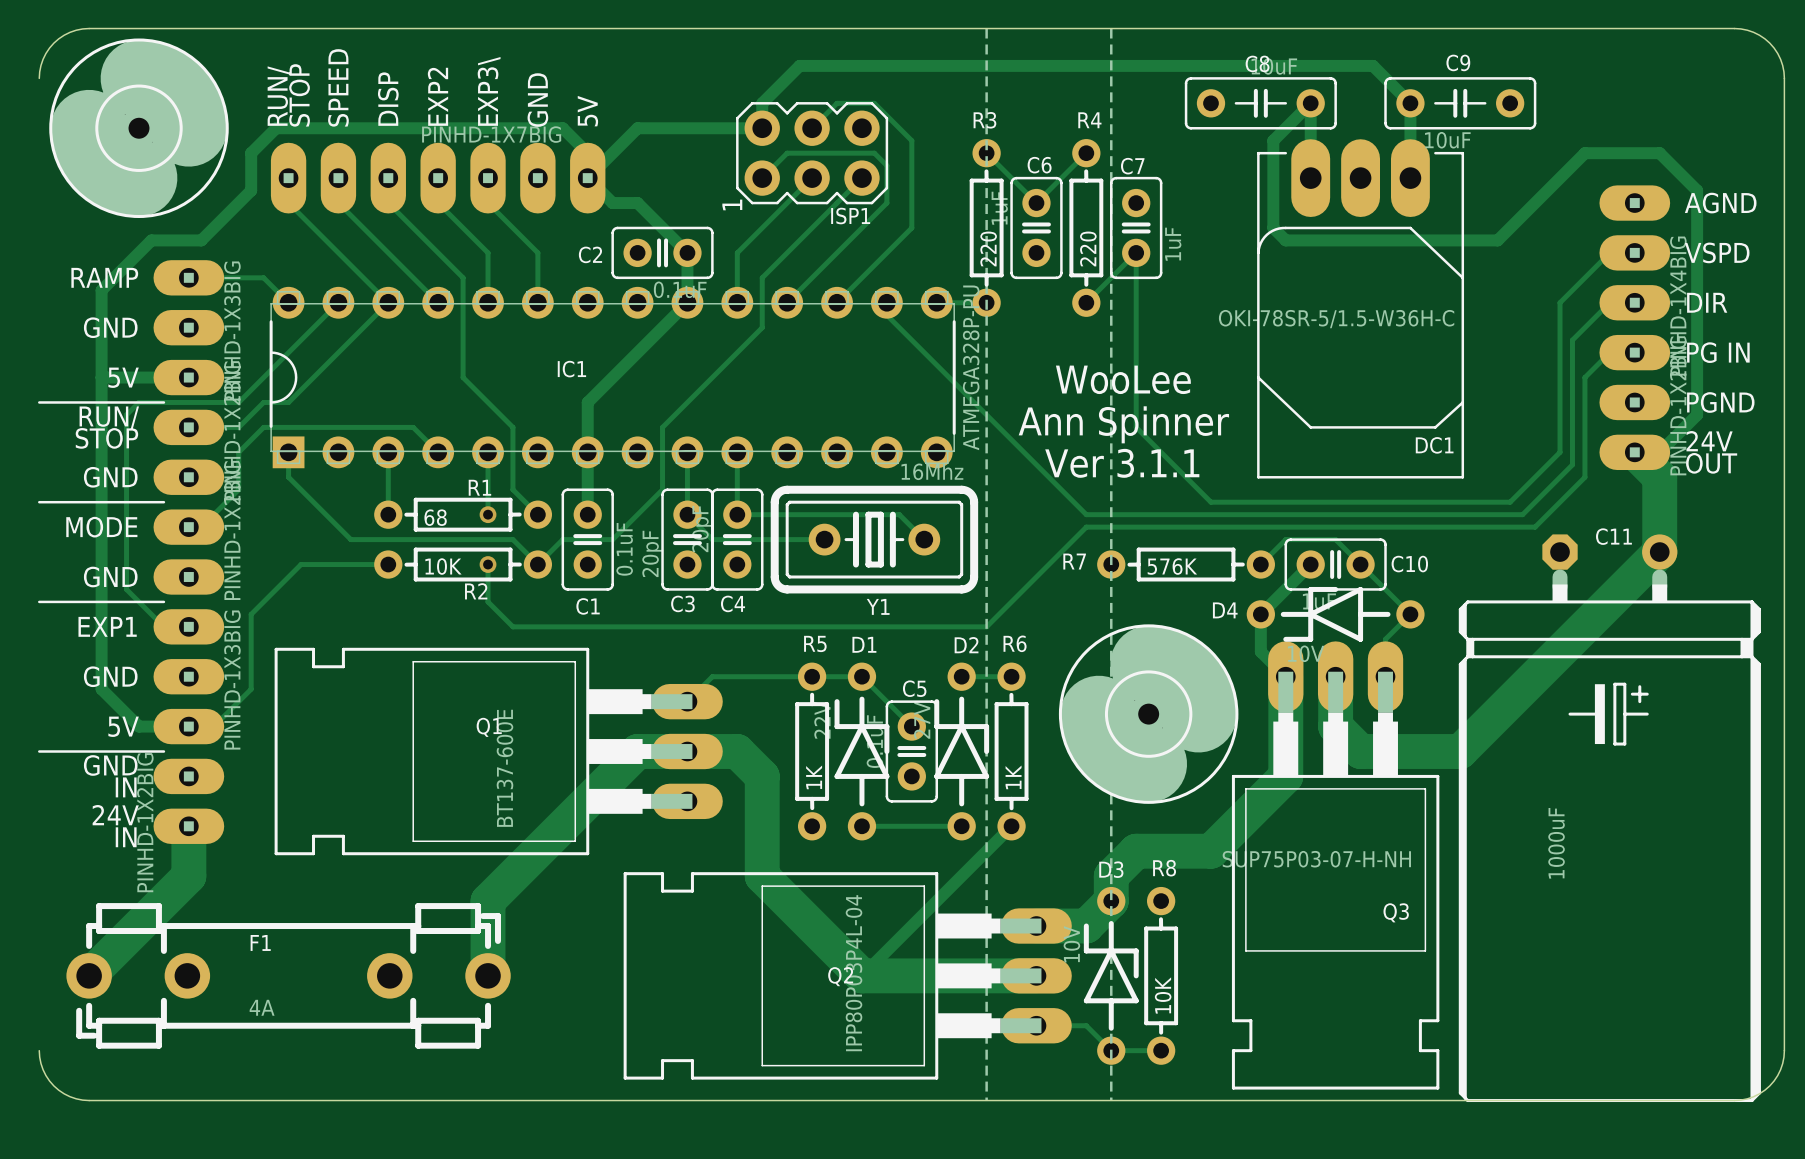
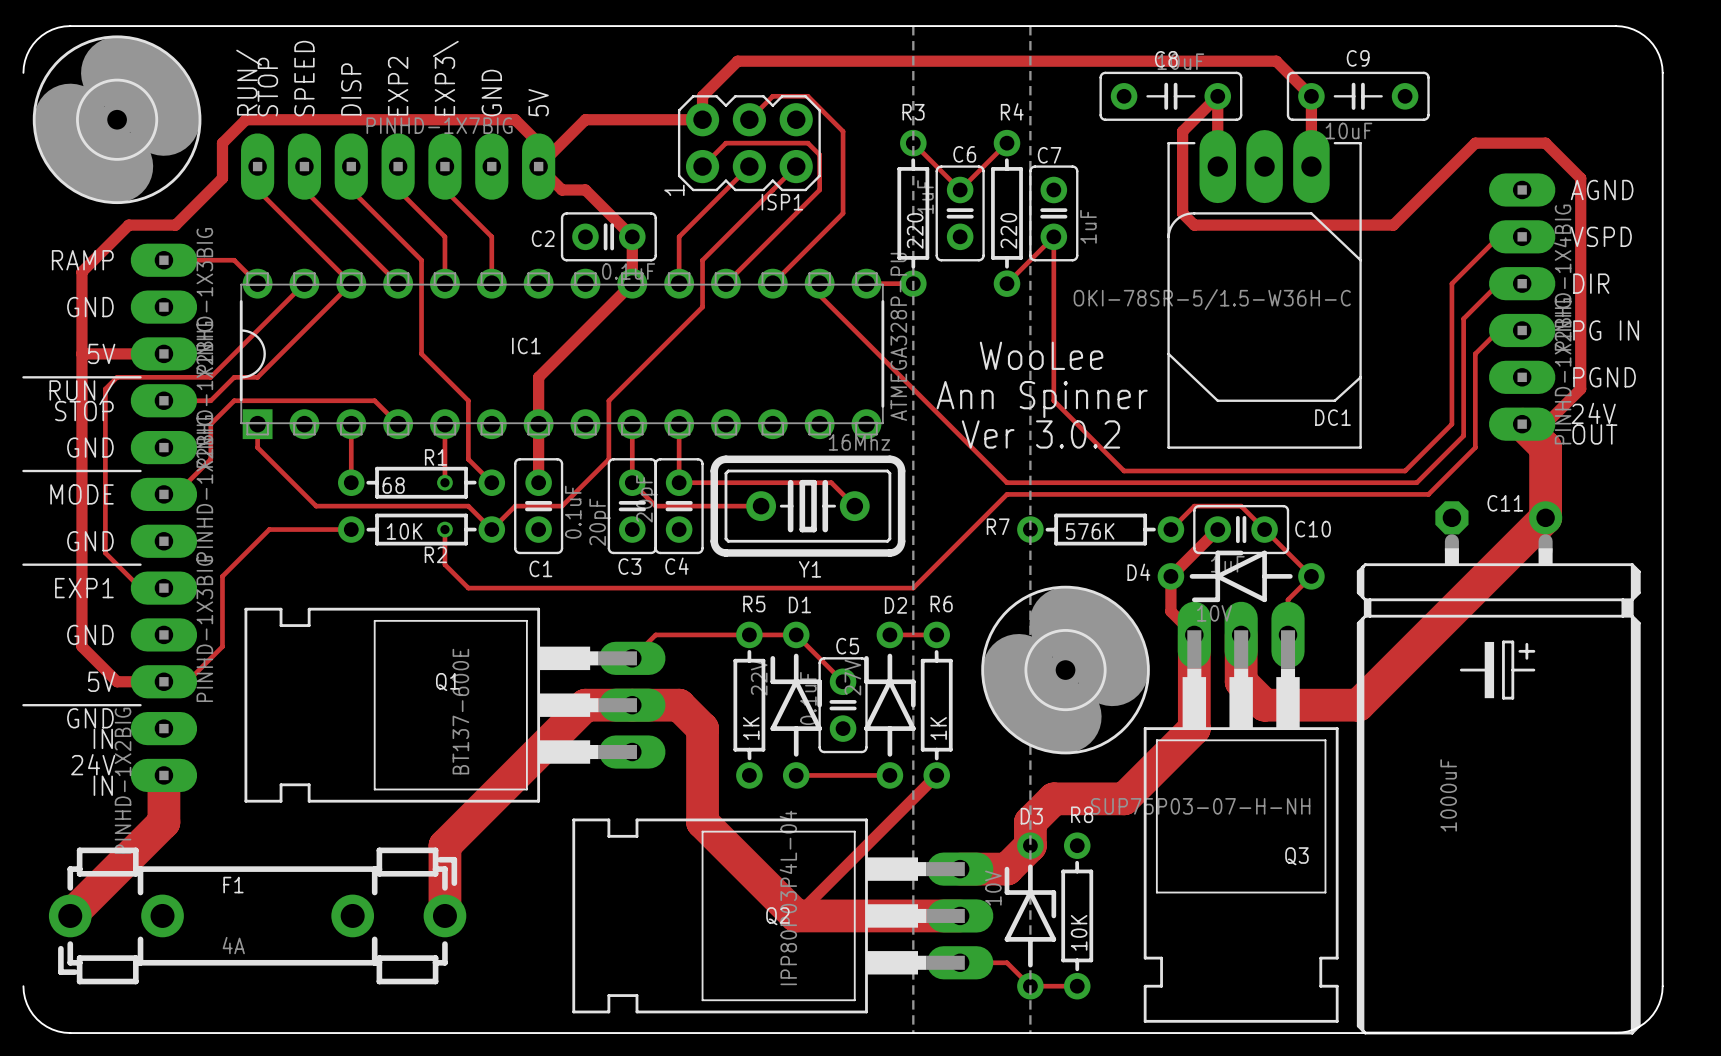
text: Ver 3.1.1 (1122, 463) -> Ver 3.0.2 (1040, 434)

